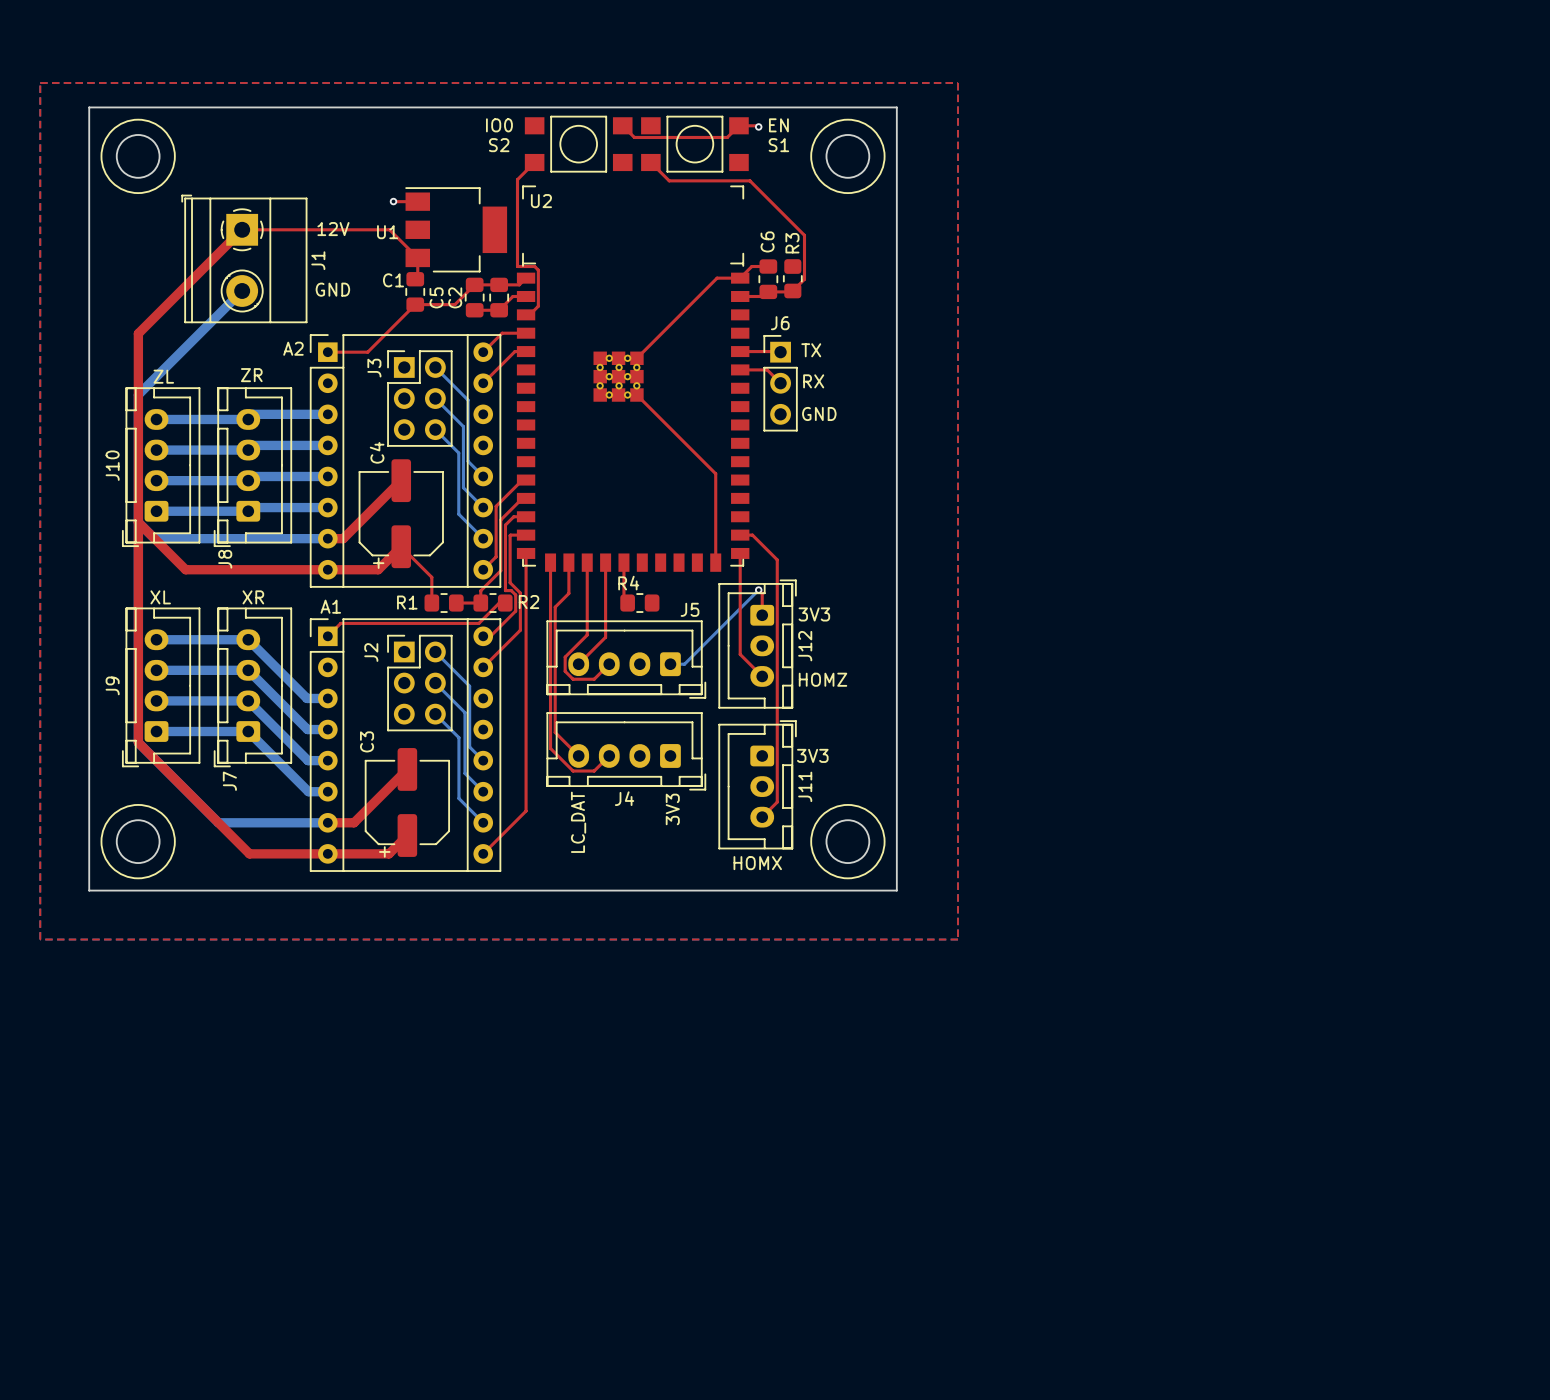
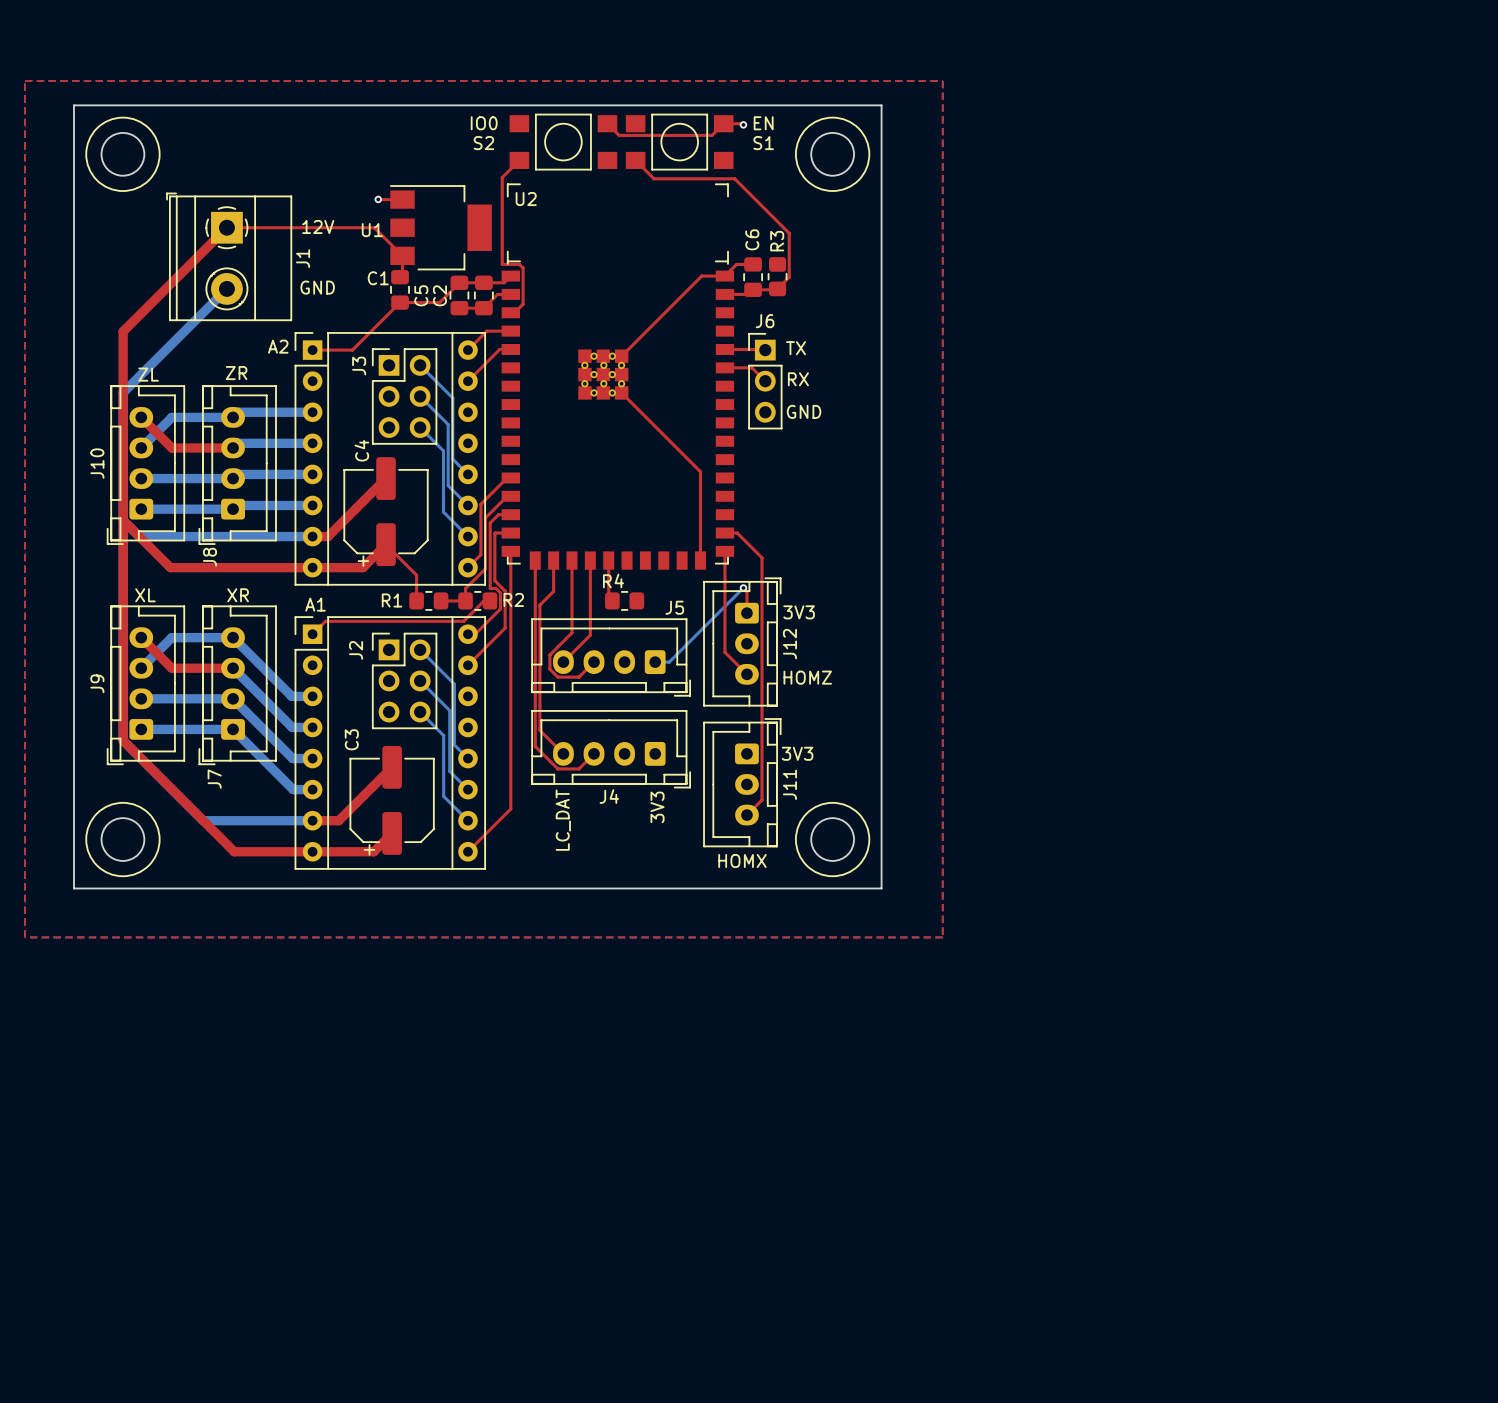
top track: none -> (141, 417) (171, 447) (233, 447)
bottom track: (156, 419) (187, 419) -> (141, 447) (171, 417)
bottom track: (156, 450) (248, 450) -> none
top track: none -> (141, 637) (171, 668) (233, 668)
bottom track: (156, 639) (187, 639) -> (141, 668) (171, 637)
bottom track: (156, 670) (248, 670) -> none

